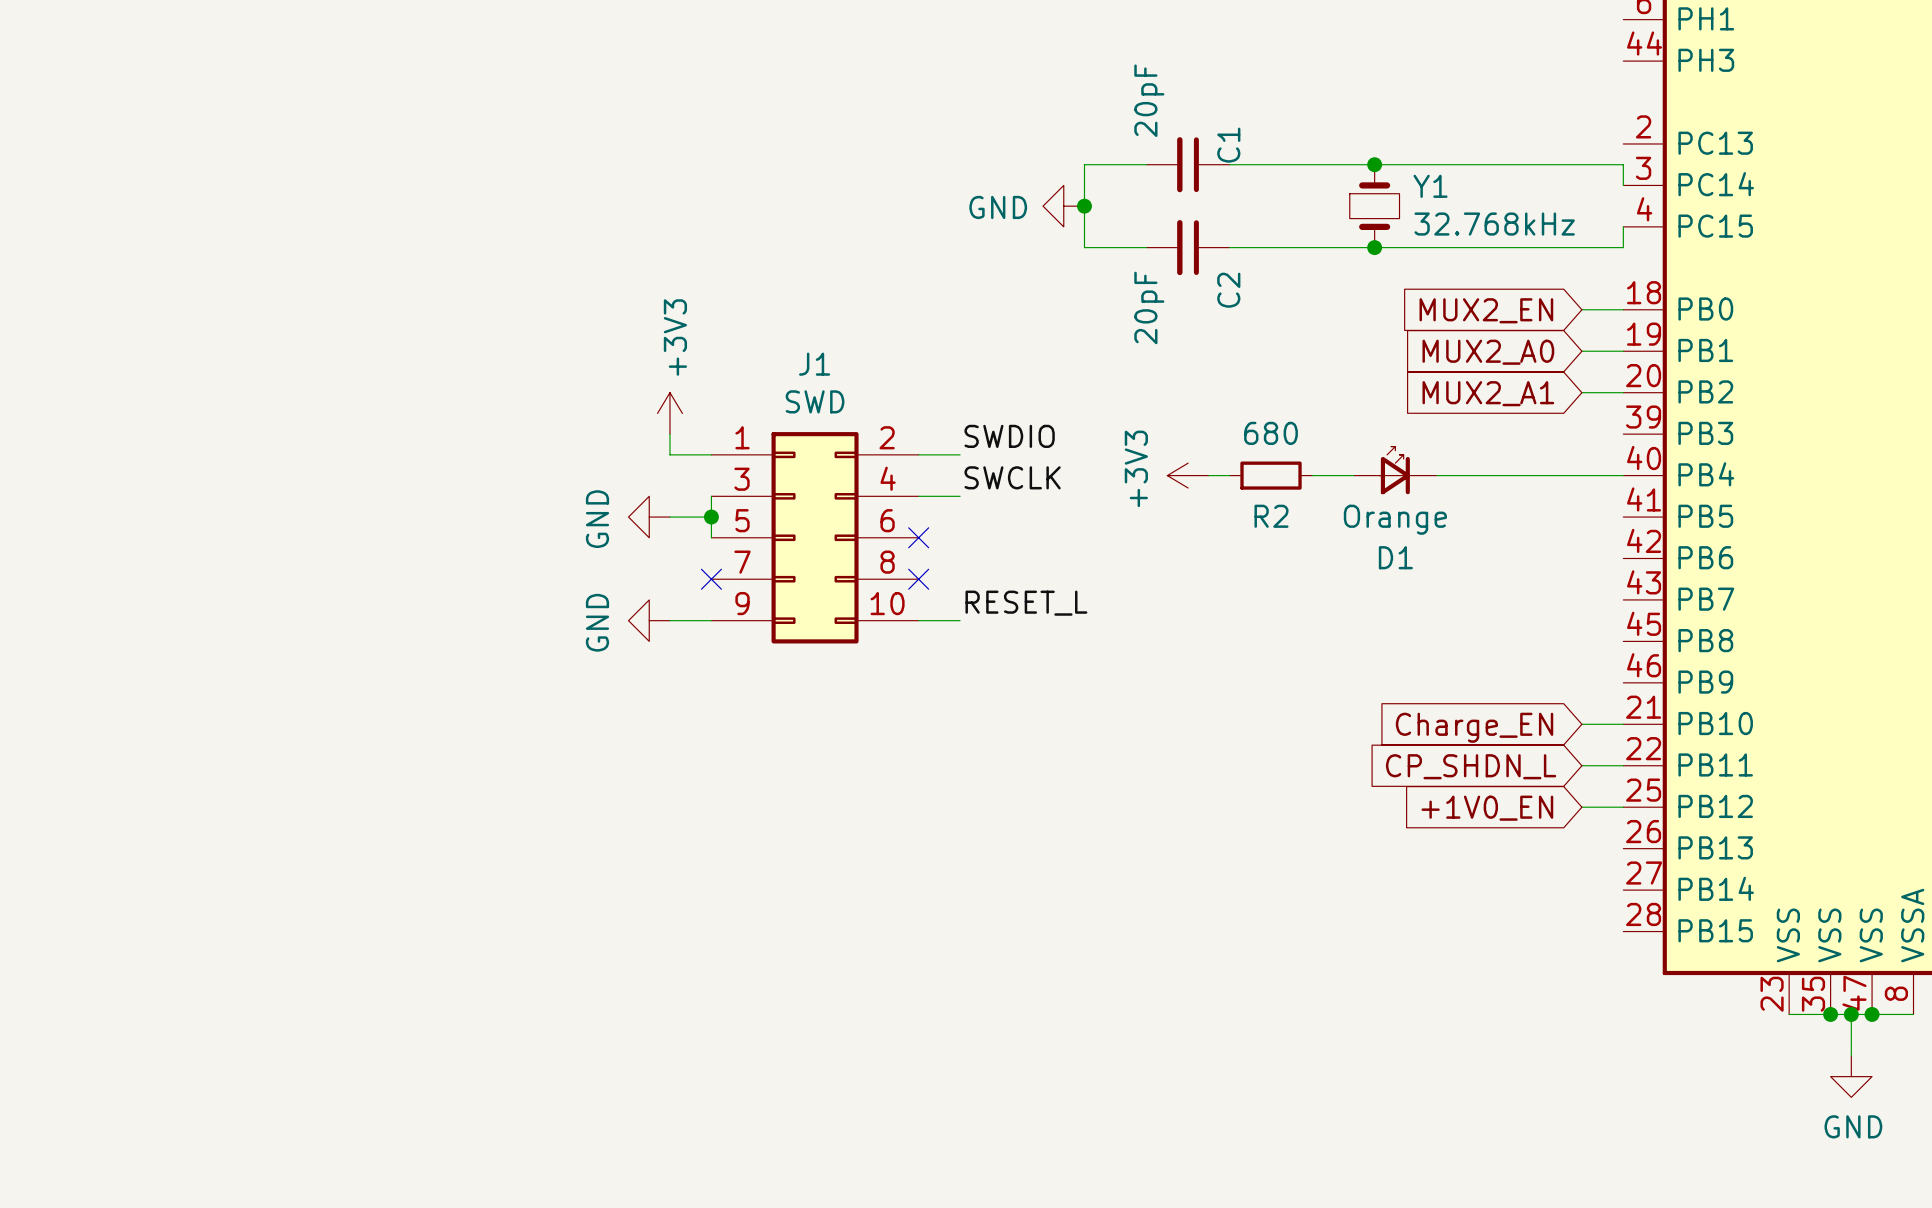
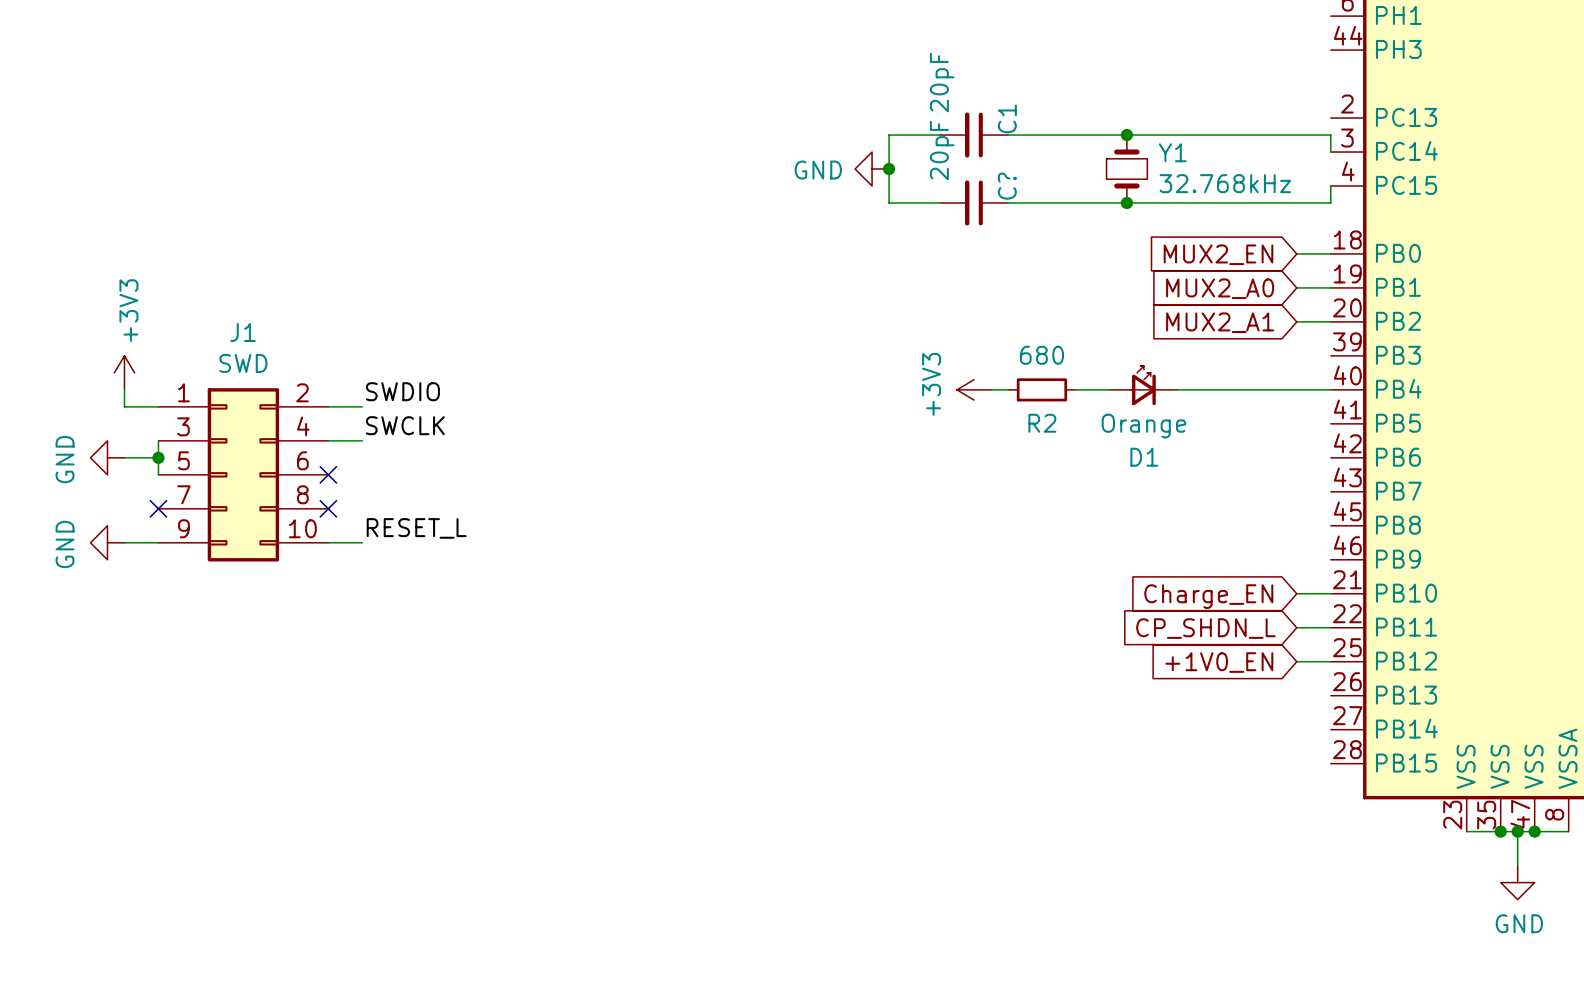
C2 name: C2 (1228, 290) -> C? (1007, 186)
C2 value position: 20pF (1149, 307) -> 20pF (942, 150)
power symbol: +3V3 (669, 413) -> none
wire: (669, 434) (669, 454) (711, 454) -> none
label: SWDIO (1009, 436) -> none
power symbol: none -> +3V3 (124, 372)
wire: (918, 454) (960, 454) -> none
wire: none -> (124, 389) (124, 406) (158, 406)
label: none -> SWDIO (402, 391)
label: SWCLK (1012, 477) -> none
wire: (711, 496) (711, 537) -> none
wire: (918, 496) (960, 496) -> none
power symbol: GND (649, 517) -> none
wire: (669, 517) (711, 517) -> (328, 406) (362, 406)
junction: (711, 517) -> none
label: none -> SWCLK (405, 425)
wire: none -> (158, 440) (158, 474)
wire: none -> (328, 440) (362, 440)
J1 position: (815, 537) -> (243, 474)
no-connect mark: (918, 537) -> none
power symbol: none -> GND (107, 457)
wire: none -> (124, 457) (158, 457)
junction: none -> (158, 457)
no-connect mark: none -> (328, 474)
no-connect mark: (711, 579) -> none
no-connect mark: (918, 579) -> none
label: RESET_L (1026, 603) -> none
no-connect mark: none -> (158, 508)
no-connect mark: none -> (328, 508)
power symbol: GND (649, 620) -> none
wire: (669, 620) (711, 620) -> (328, 542) (362, 542)
wire: (918, 620) (960, 620) -> none
label: none -> RESET_L (416, 528)
power symbol: none -> GND (107, 542)
wire: none -> (124, 542) (158, 542)

